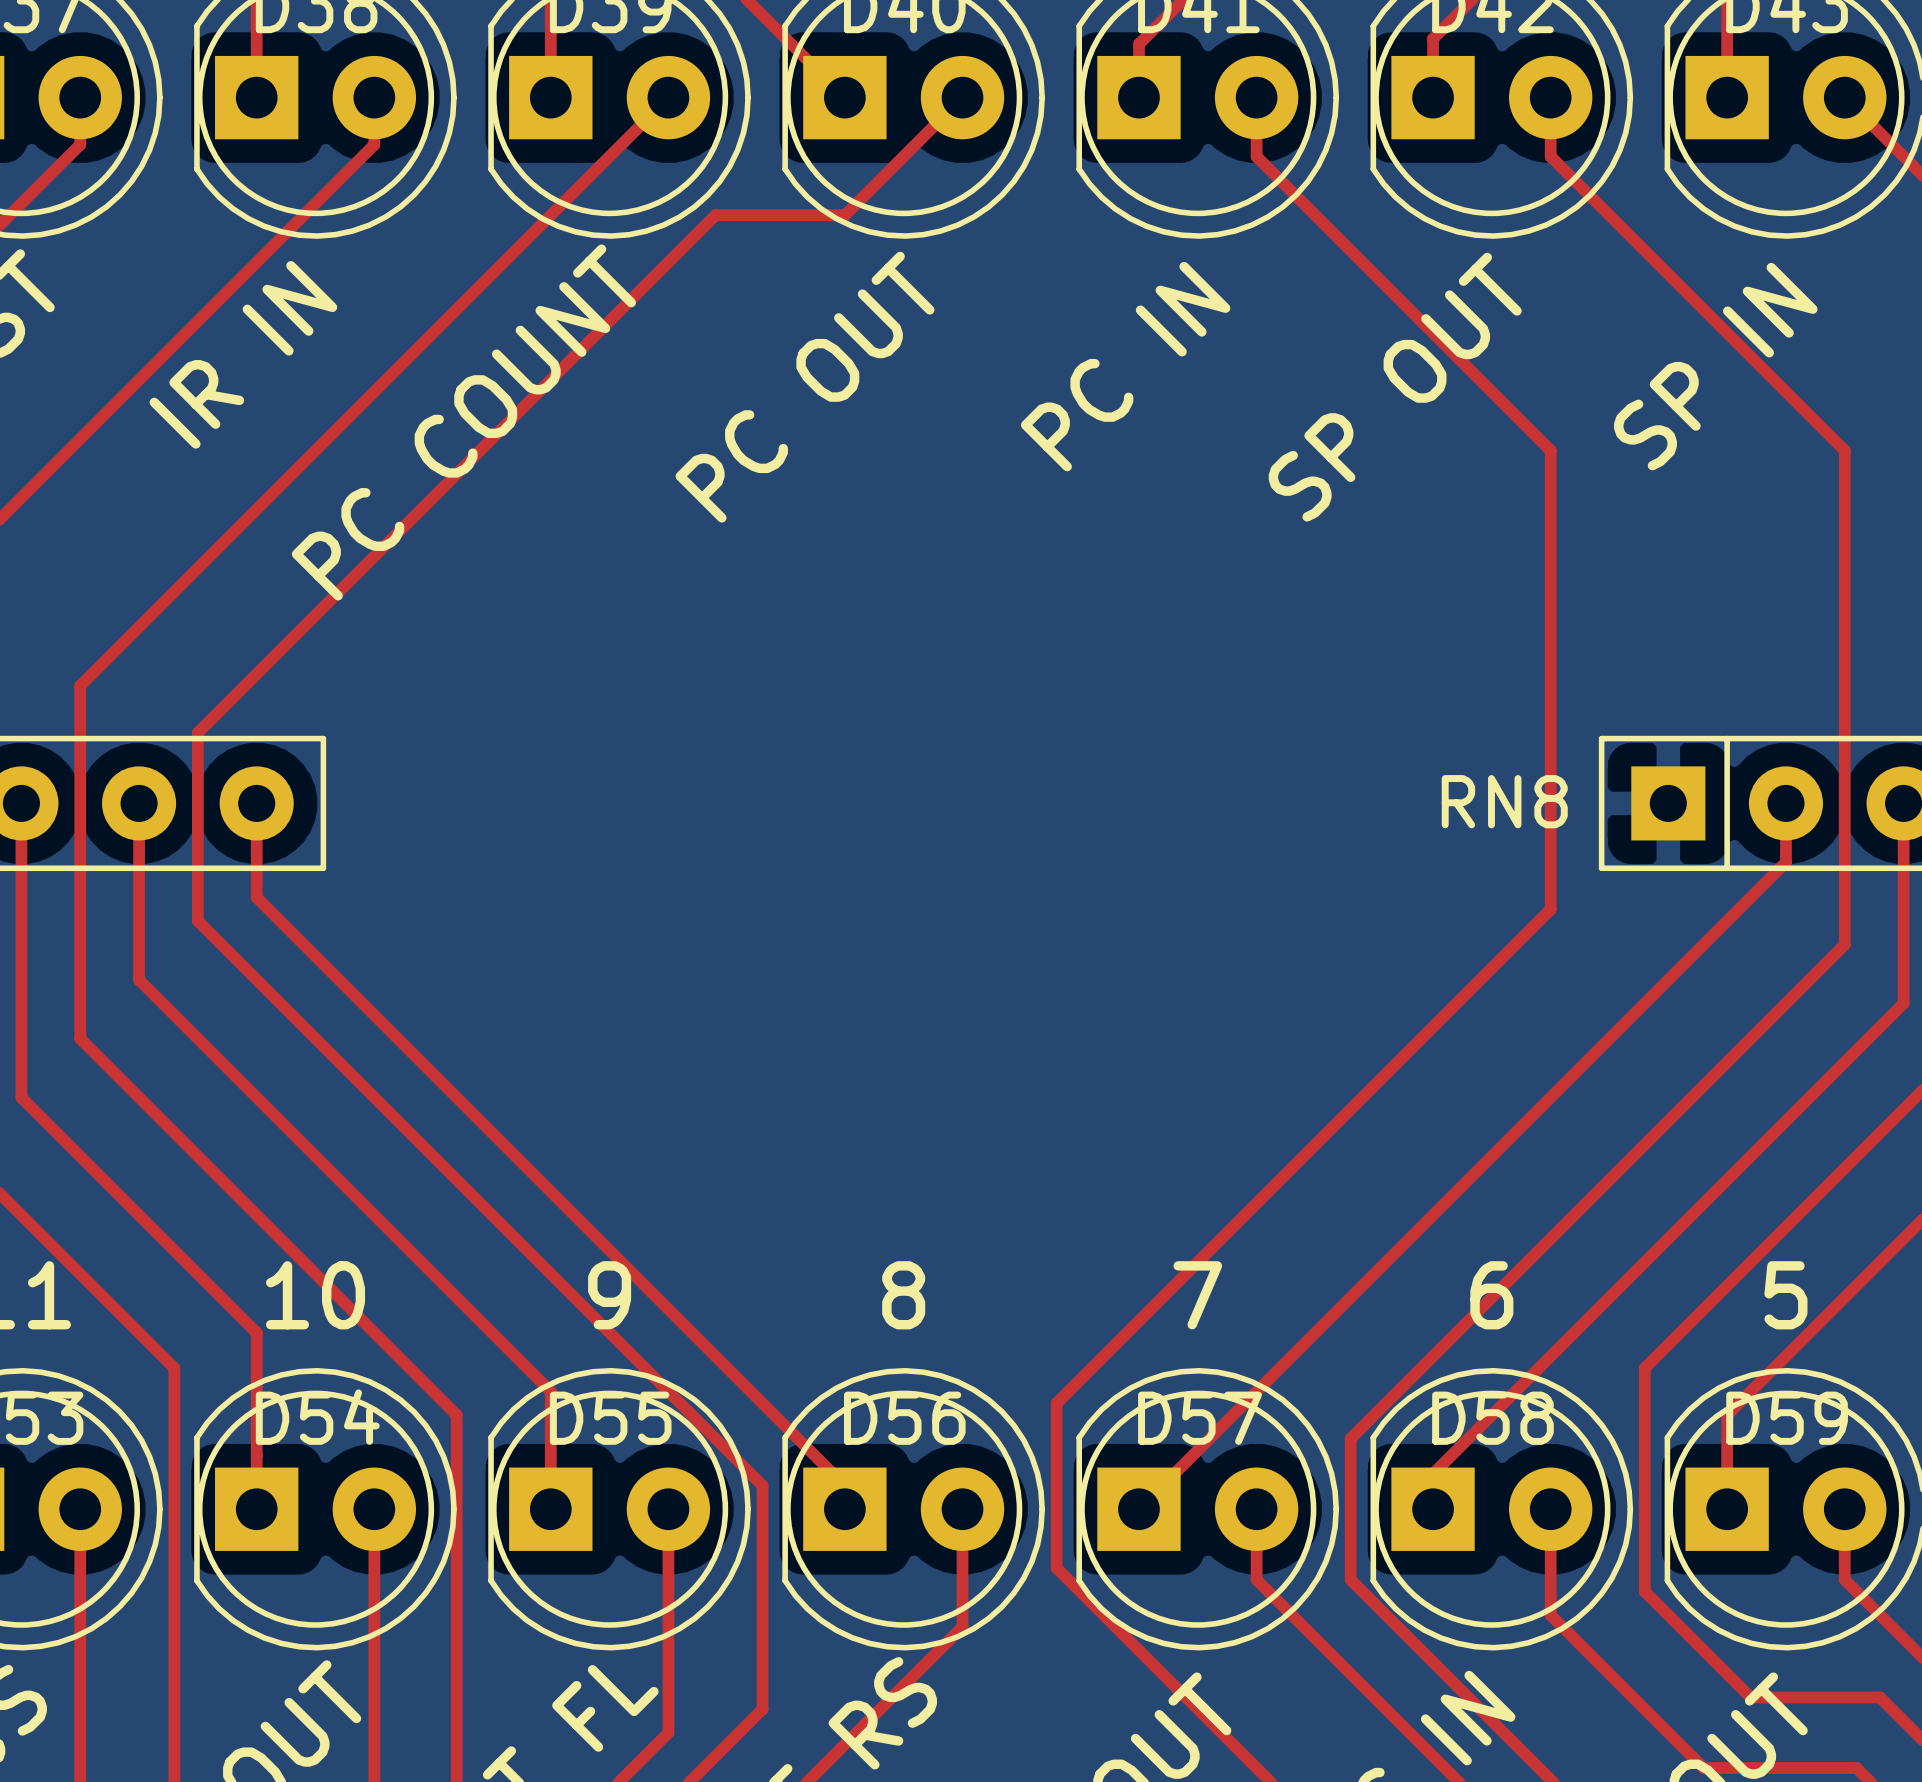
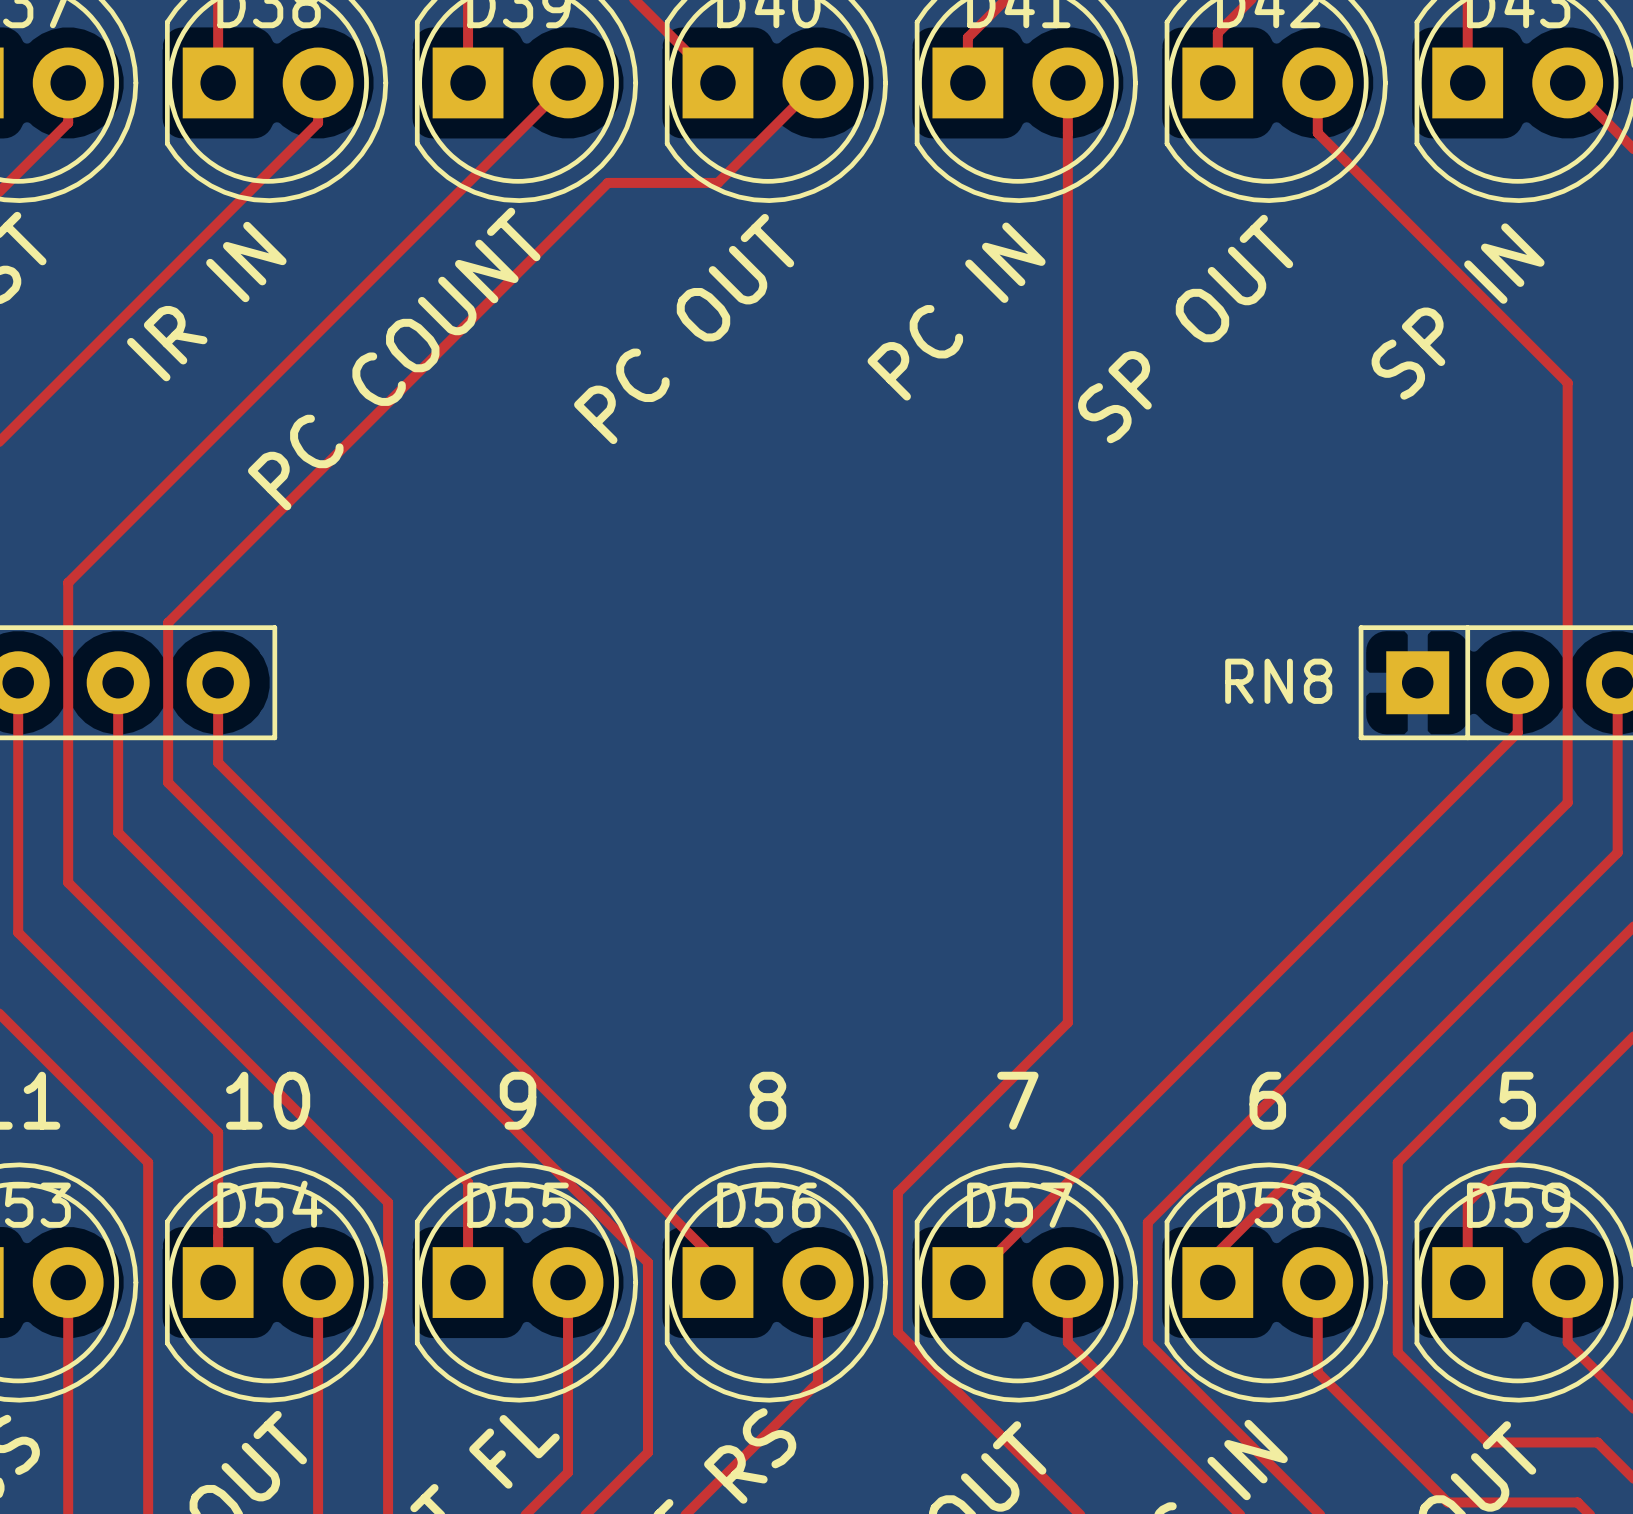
top track: (1256, 156) (1550, 450) (1550, 909) (1256, 1203) -> (1067, 133) (1067, 1022)

